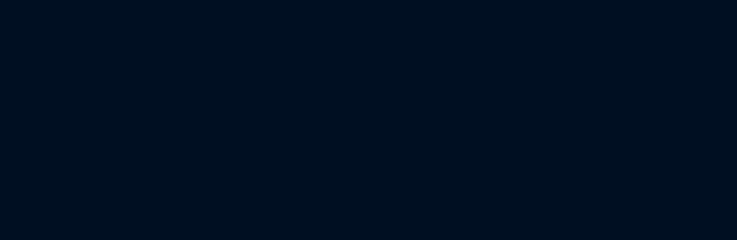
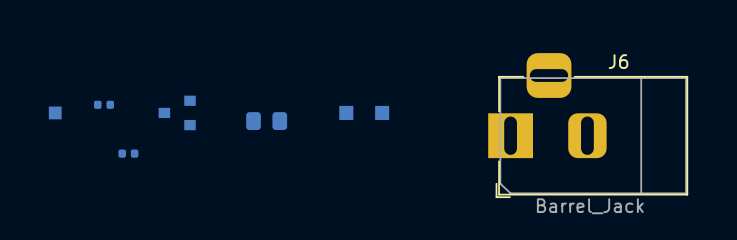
part: none -> (104, 104)
part: none -> (55, 112)
part: none -> (177, 112)
part: none -> (364, 112)
part: none -> (266, 121)
J6: none -> Barrel_Jack (588, 125)
part: none -> (128, 153)

